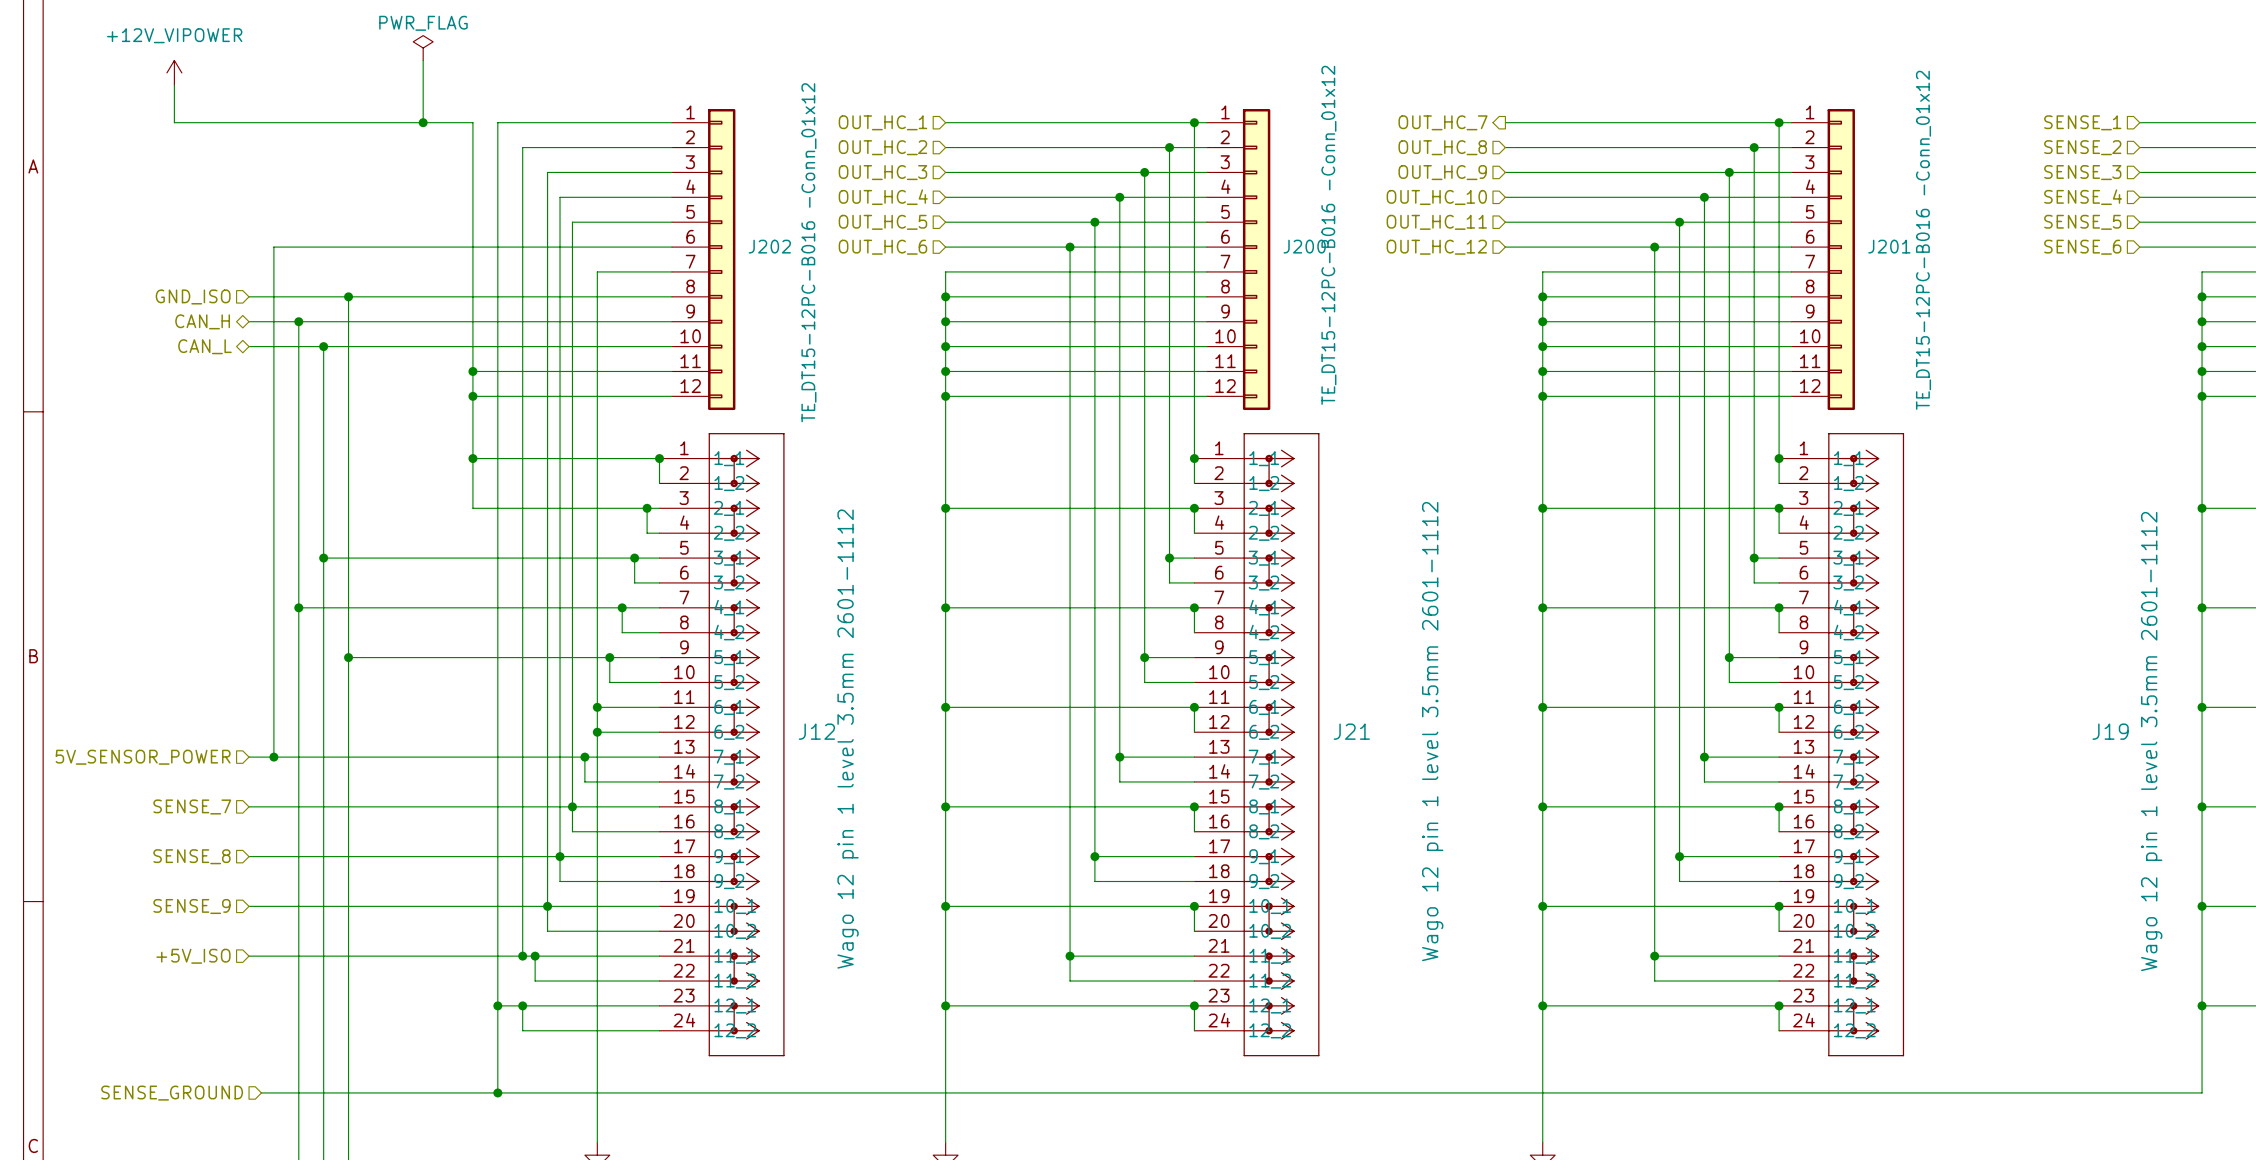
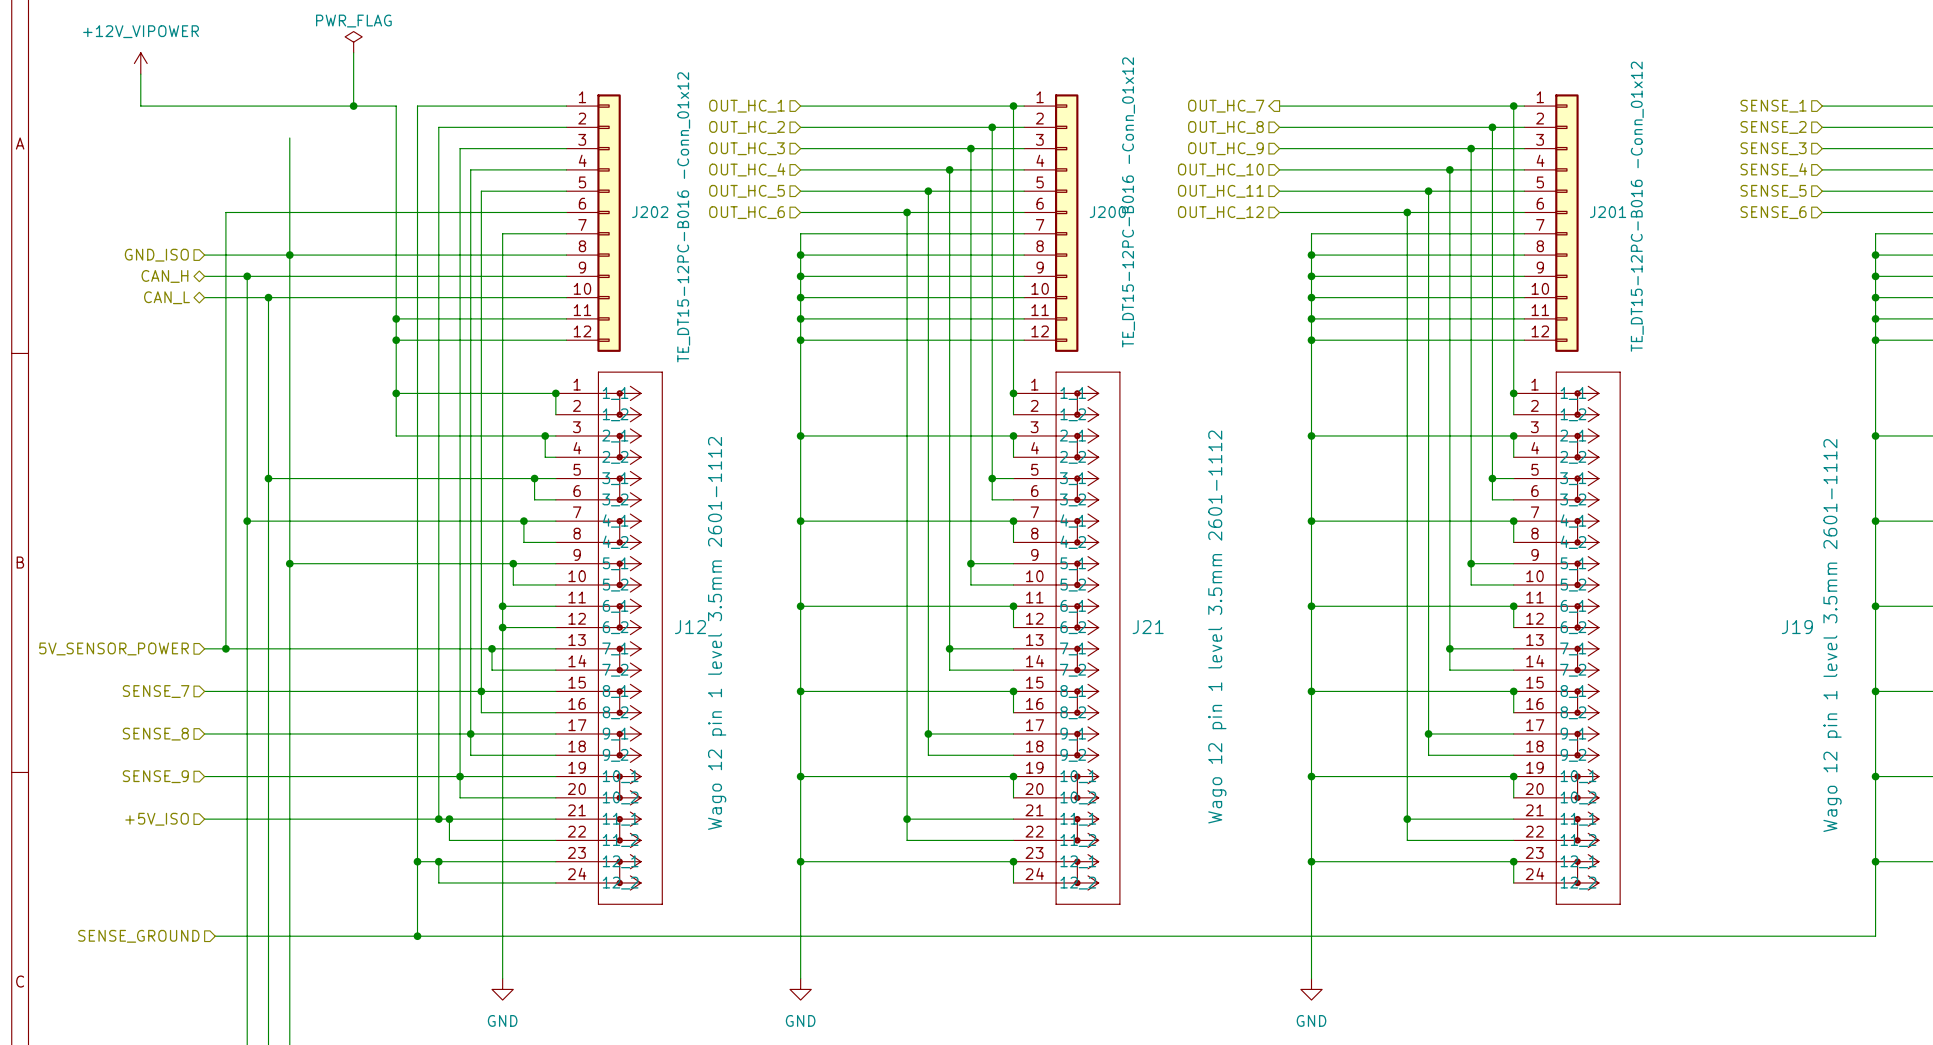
wire: none -> (289, 137) (289, 255)

